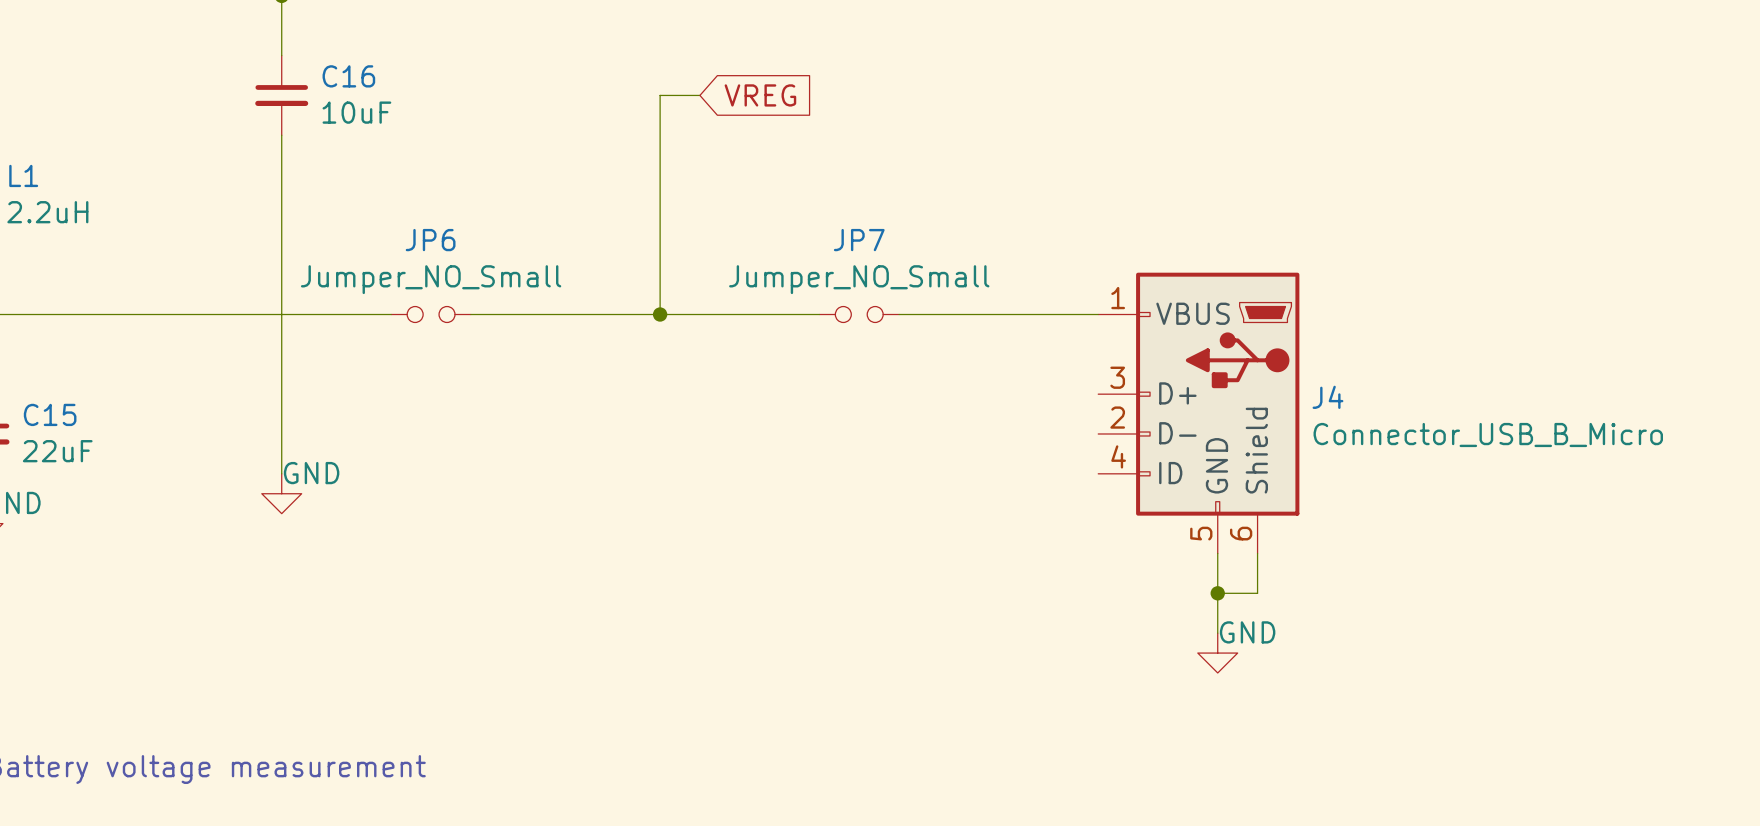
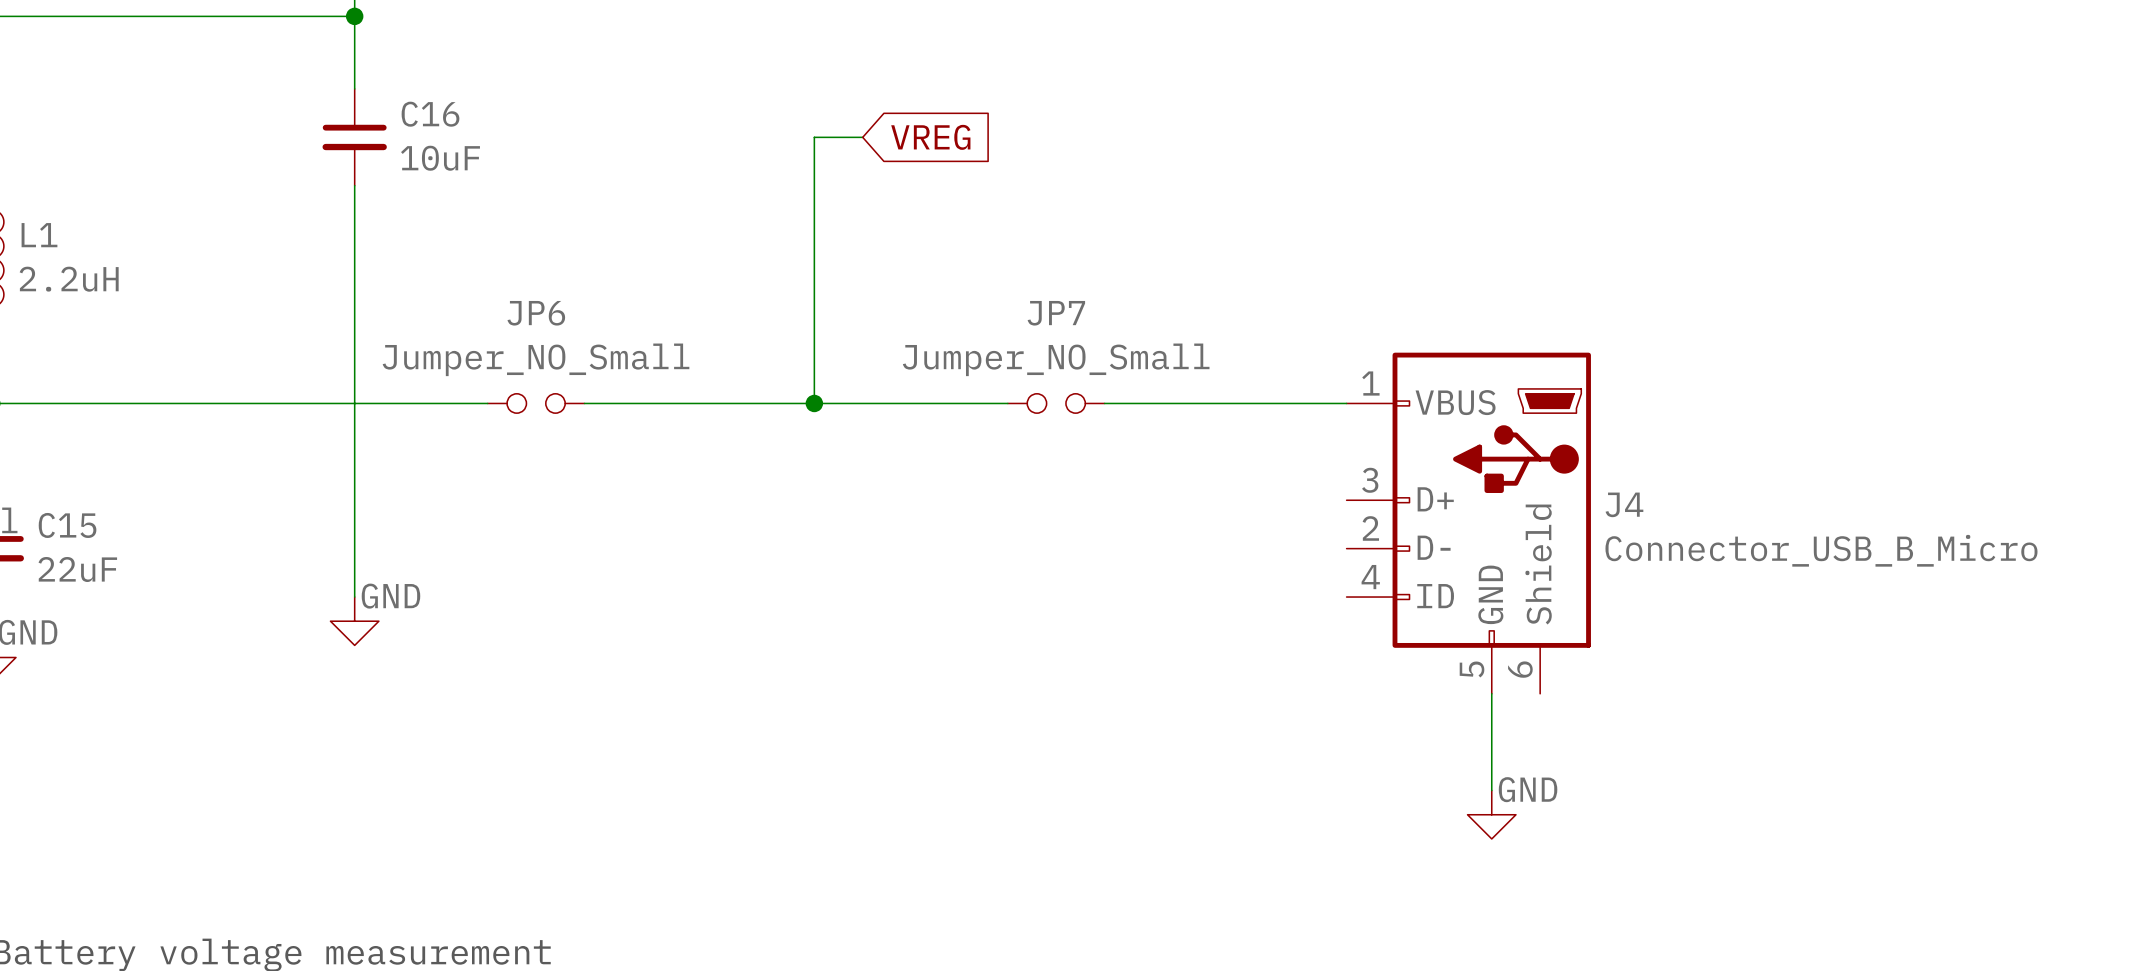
wire: (1257, 553) (1257, 593) (1217, 593) -> none
junction: (1217, 593) -> none

